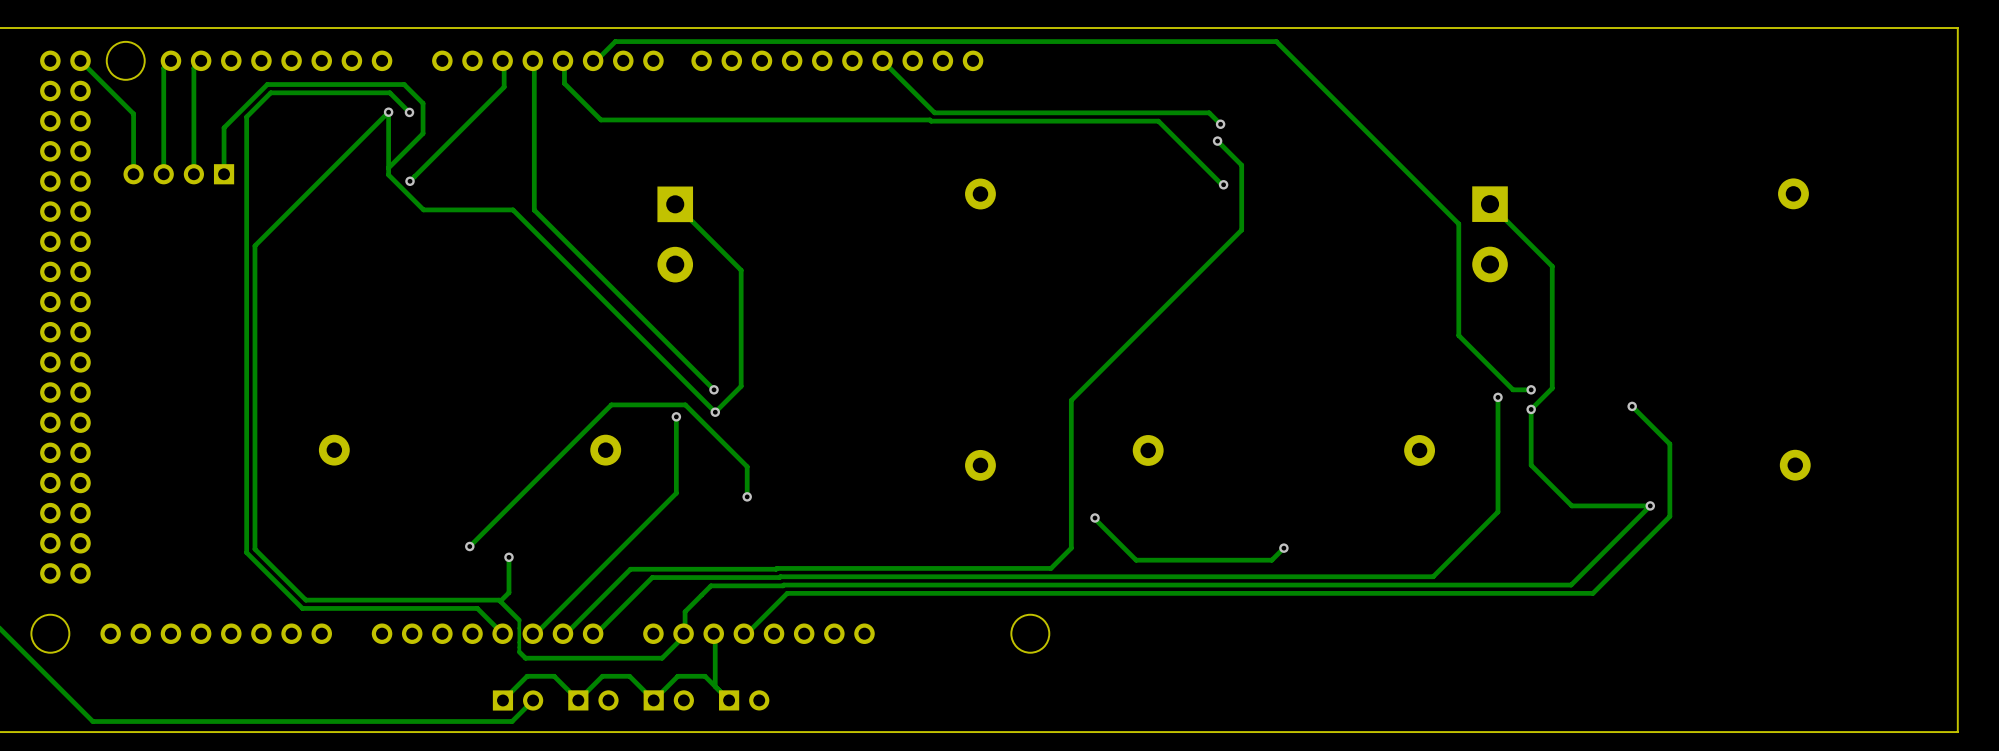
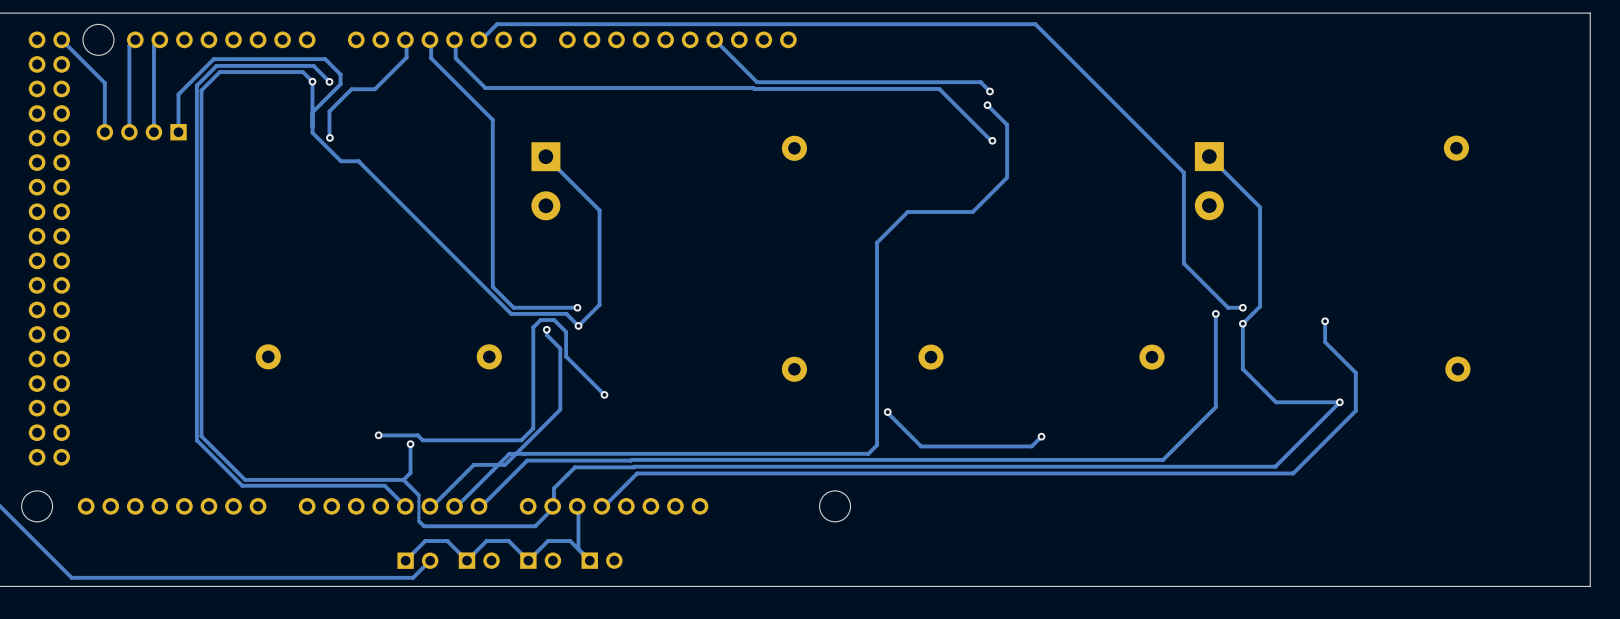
track: (504, 82) (504, 87) (410, 181) -> (406, 57) (374, 89) (351, 89) (329, 111) (329, 138)
track: (534, 83) (534, 210) (714, 389) -> (431, 58) (492, 119) (492, 286) (513, 307) (577, 307)
track: (388, 112) (254, 245) (254, 549) (305, 600) (500, 601) -> (312, 81) (302, 72) (219, 72) (201, 90) (201, 436) (245, 479) (403, 479)
track: (423, 115) (423, 133) (388, 167) -> (340, 84) (312, 112)
track: (445, 209) (513, 209) (700, 397) -> (358, 161) (511, 313) (566, 313)
track: (1199, 272) (1071, 400) (1071, 548) (1051, 568) (776, 569) -> (972, 211) (907, 211) (877, 242) (877, 445) (868, 453) (628, 453)
track: (668, 404) (611, 404) (469, 546) -> (540, 320) (533, 327) (533, 428) (521, 440) (422, 440) (417, 435) (378, 435)
track: (1632, 406) (1669, 444) (1669, 469) -> (1325, 321) (1325, 342) (1355, 372)
track: (700, 419) (747, 466) (747, 496) -> (566, 331) (566, 356) (604, 394)
track: (676, 423) (676, 493) (586, 582) -> (546, 335) (560, 348) (560, 409) (505, 464) (473, 464)

